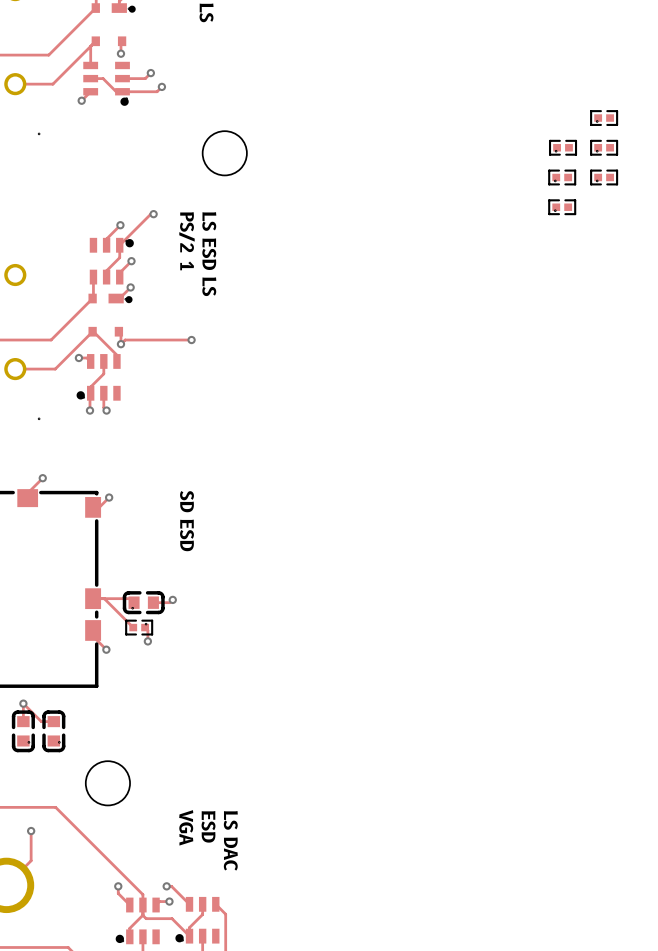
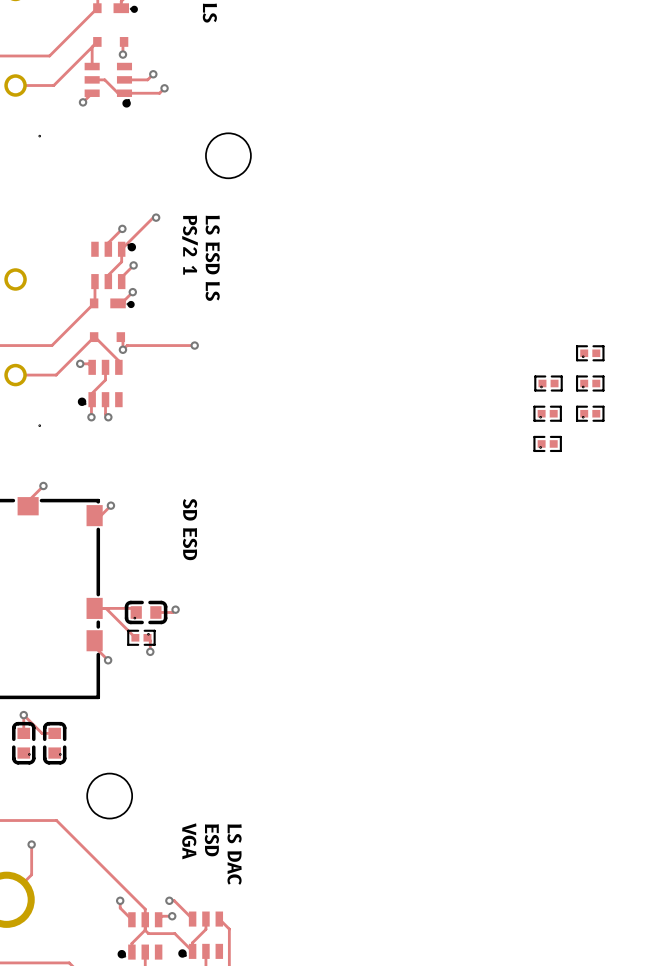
part: (604, 118) -> none
part: (563, 147) -> none
part: (604, 147) -> none
part: (562, 177) -> none
part: (604, 177) -> none
part: (562, 207) -> none
part: none -> (590, 353)
part: none -> (548, 383)
part: none -> (590, 383)
part: none -> (547, 413)
part: none -> (590, 413)
part: none -> (547, 443)

